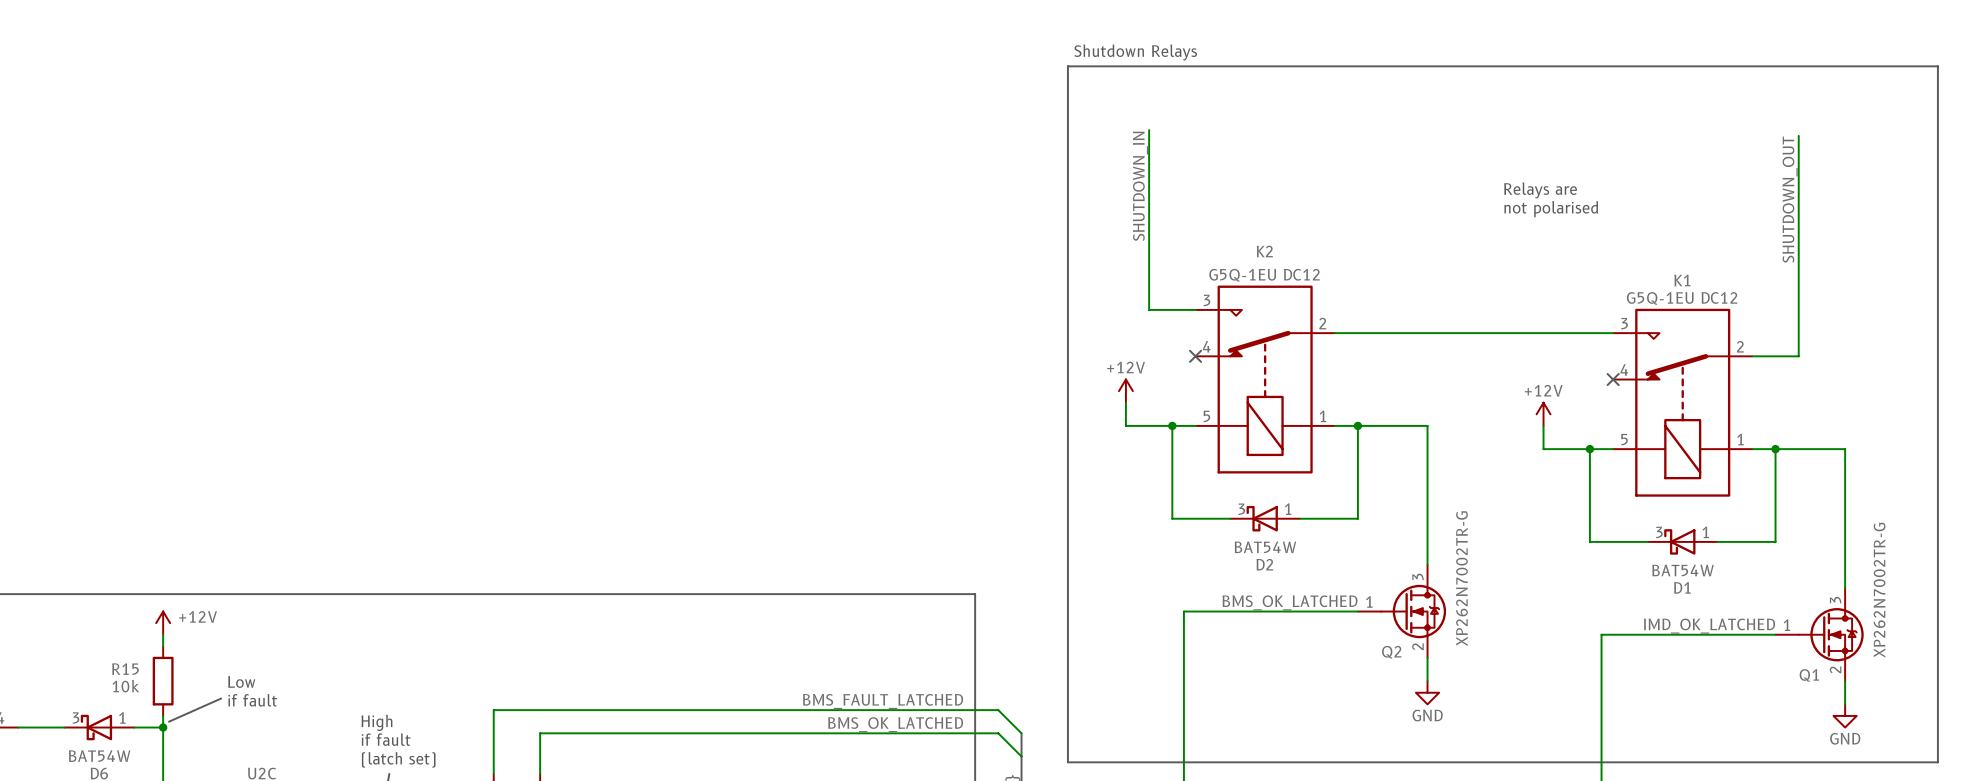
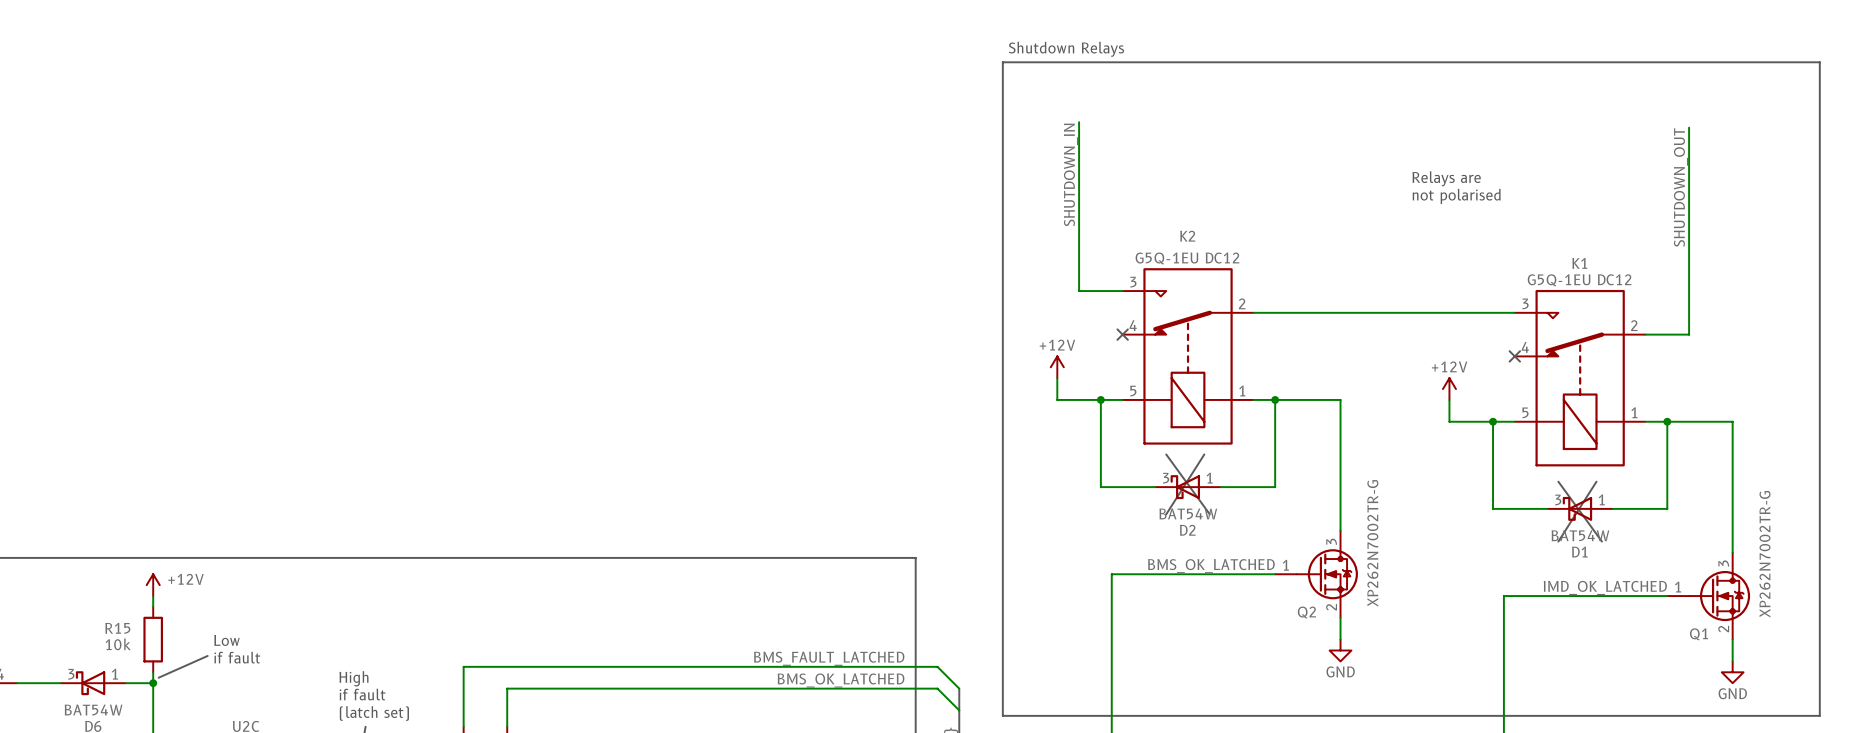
line: none -> (1166, 454) (1209, 514)
line: none -> (1204, 454) (1166, 514)
line: none -> (1558, 481) (1601, 541)
line: none -> (1596, 481) (1558, 541)

